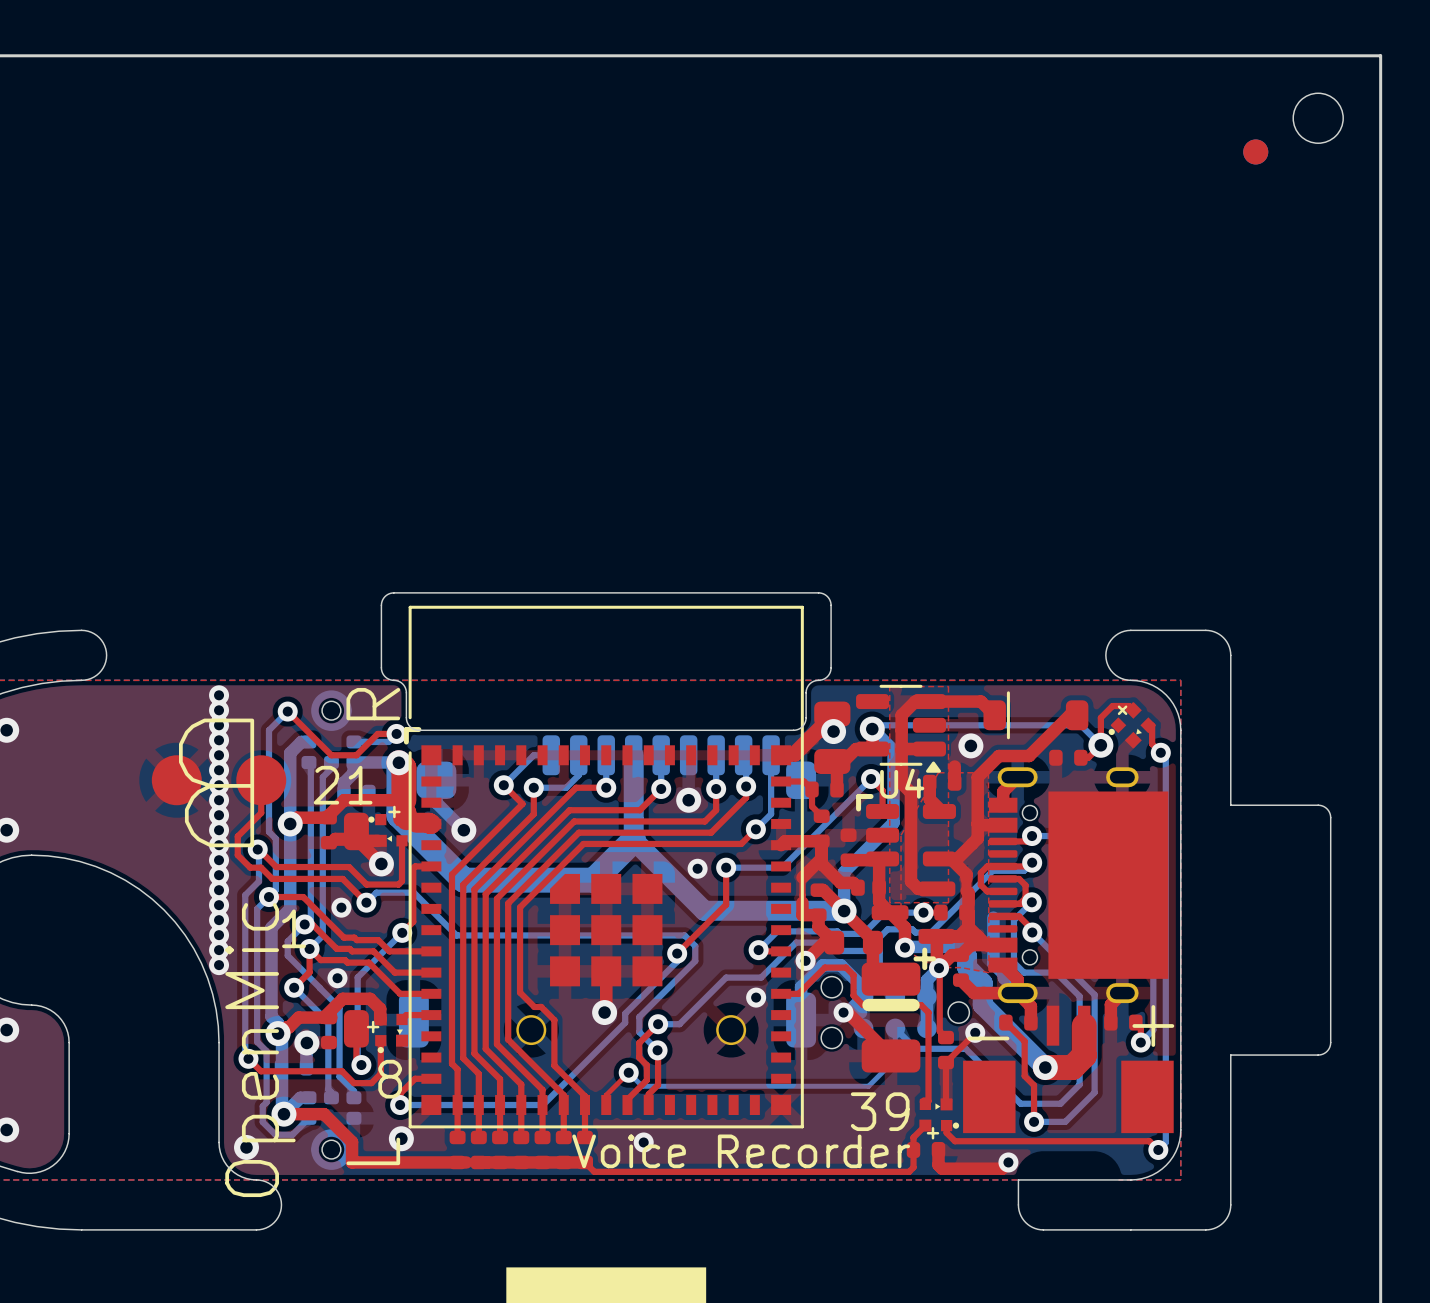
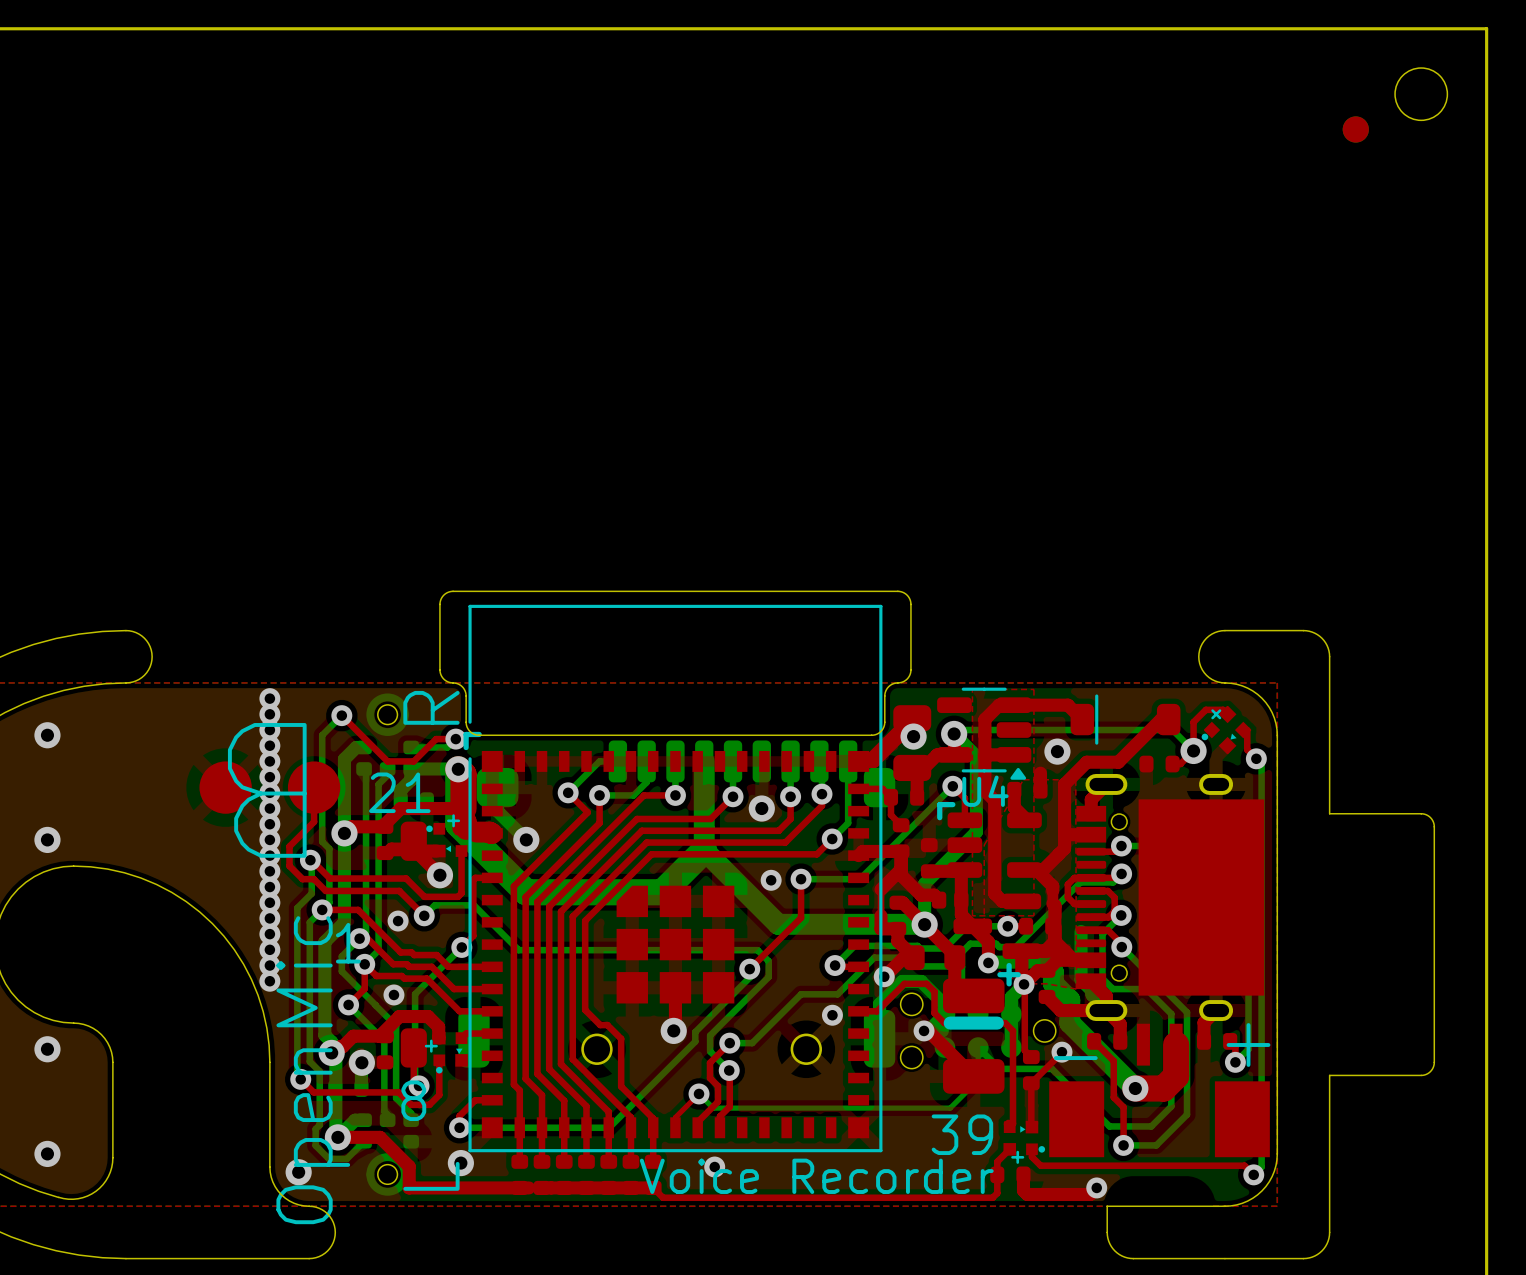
text position: 8 (390, 1079) -> 8 (413, 1100)

